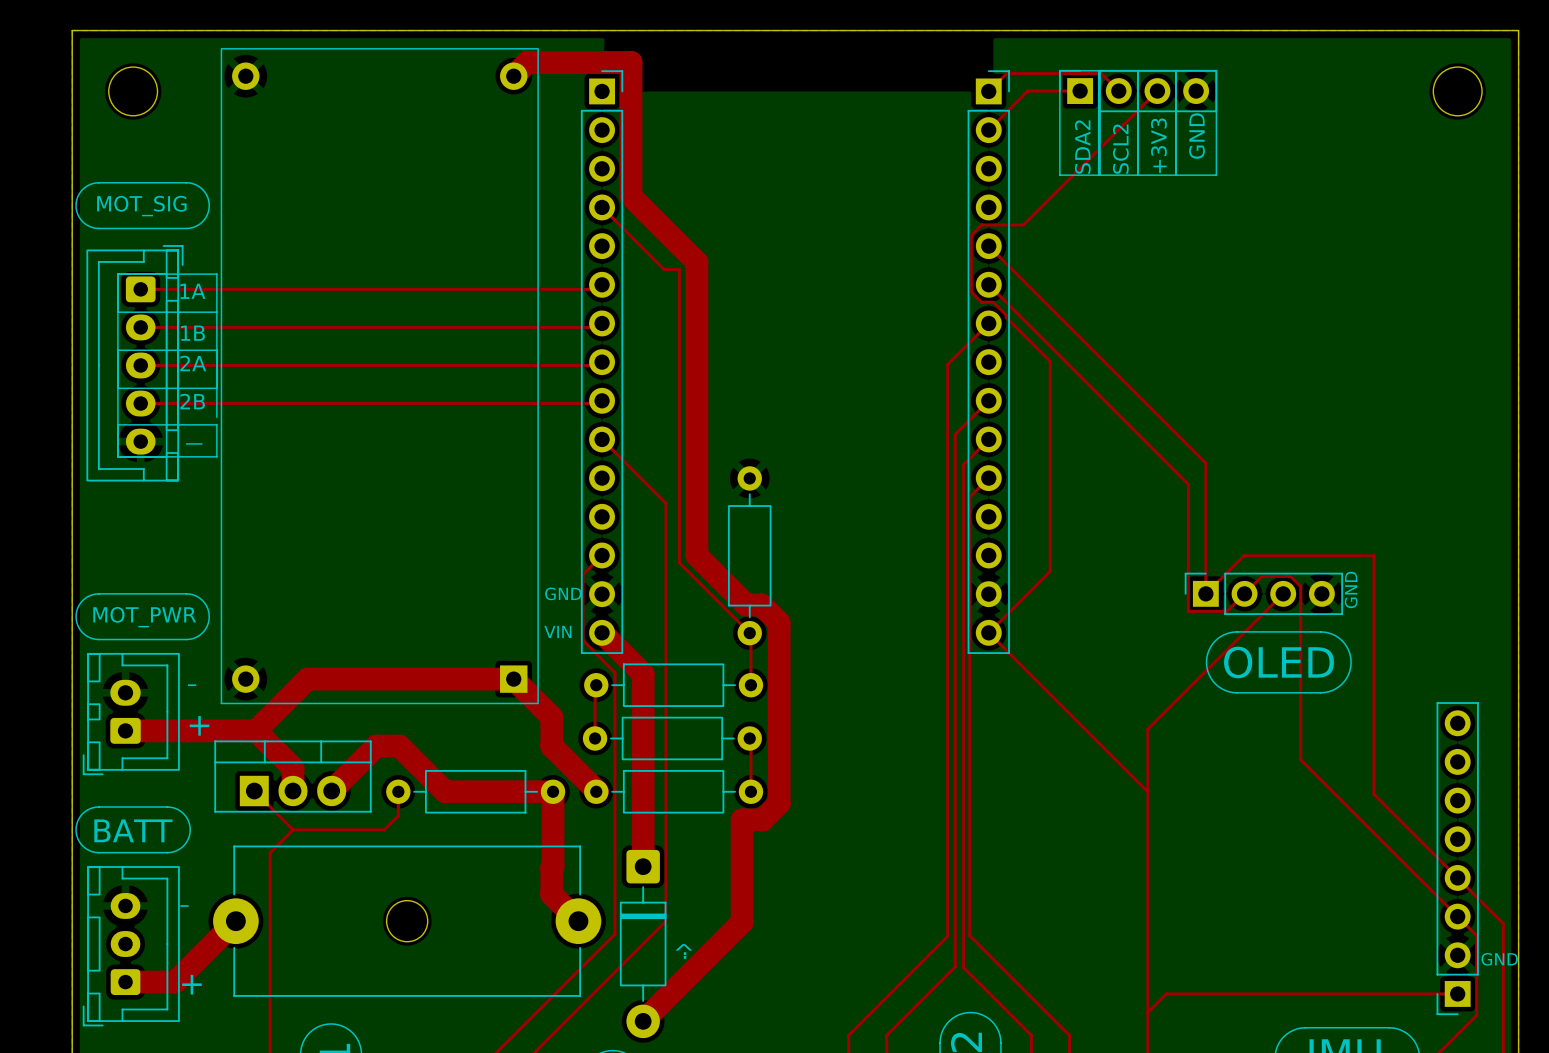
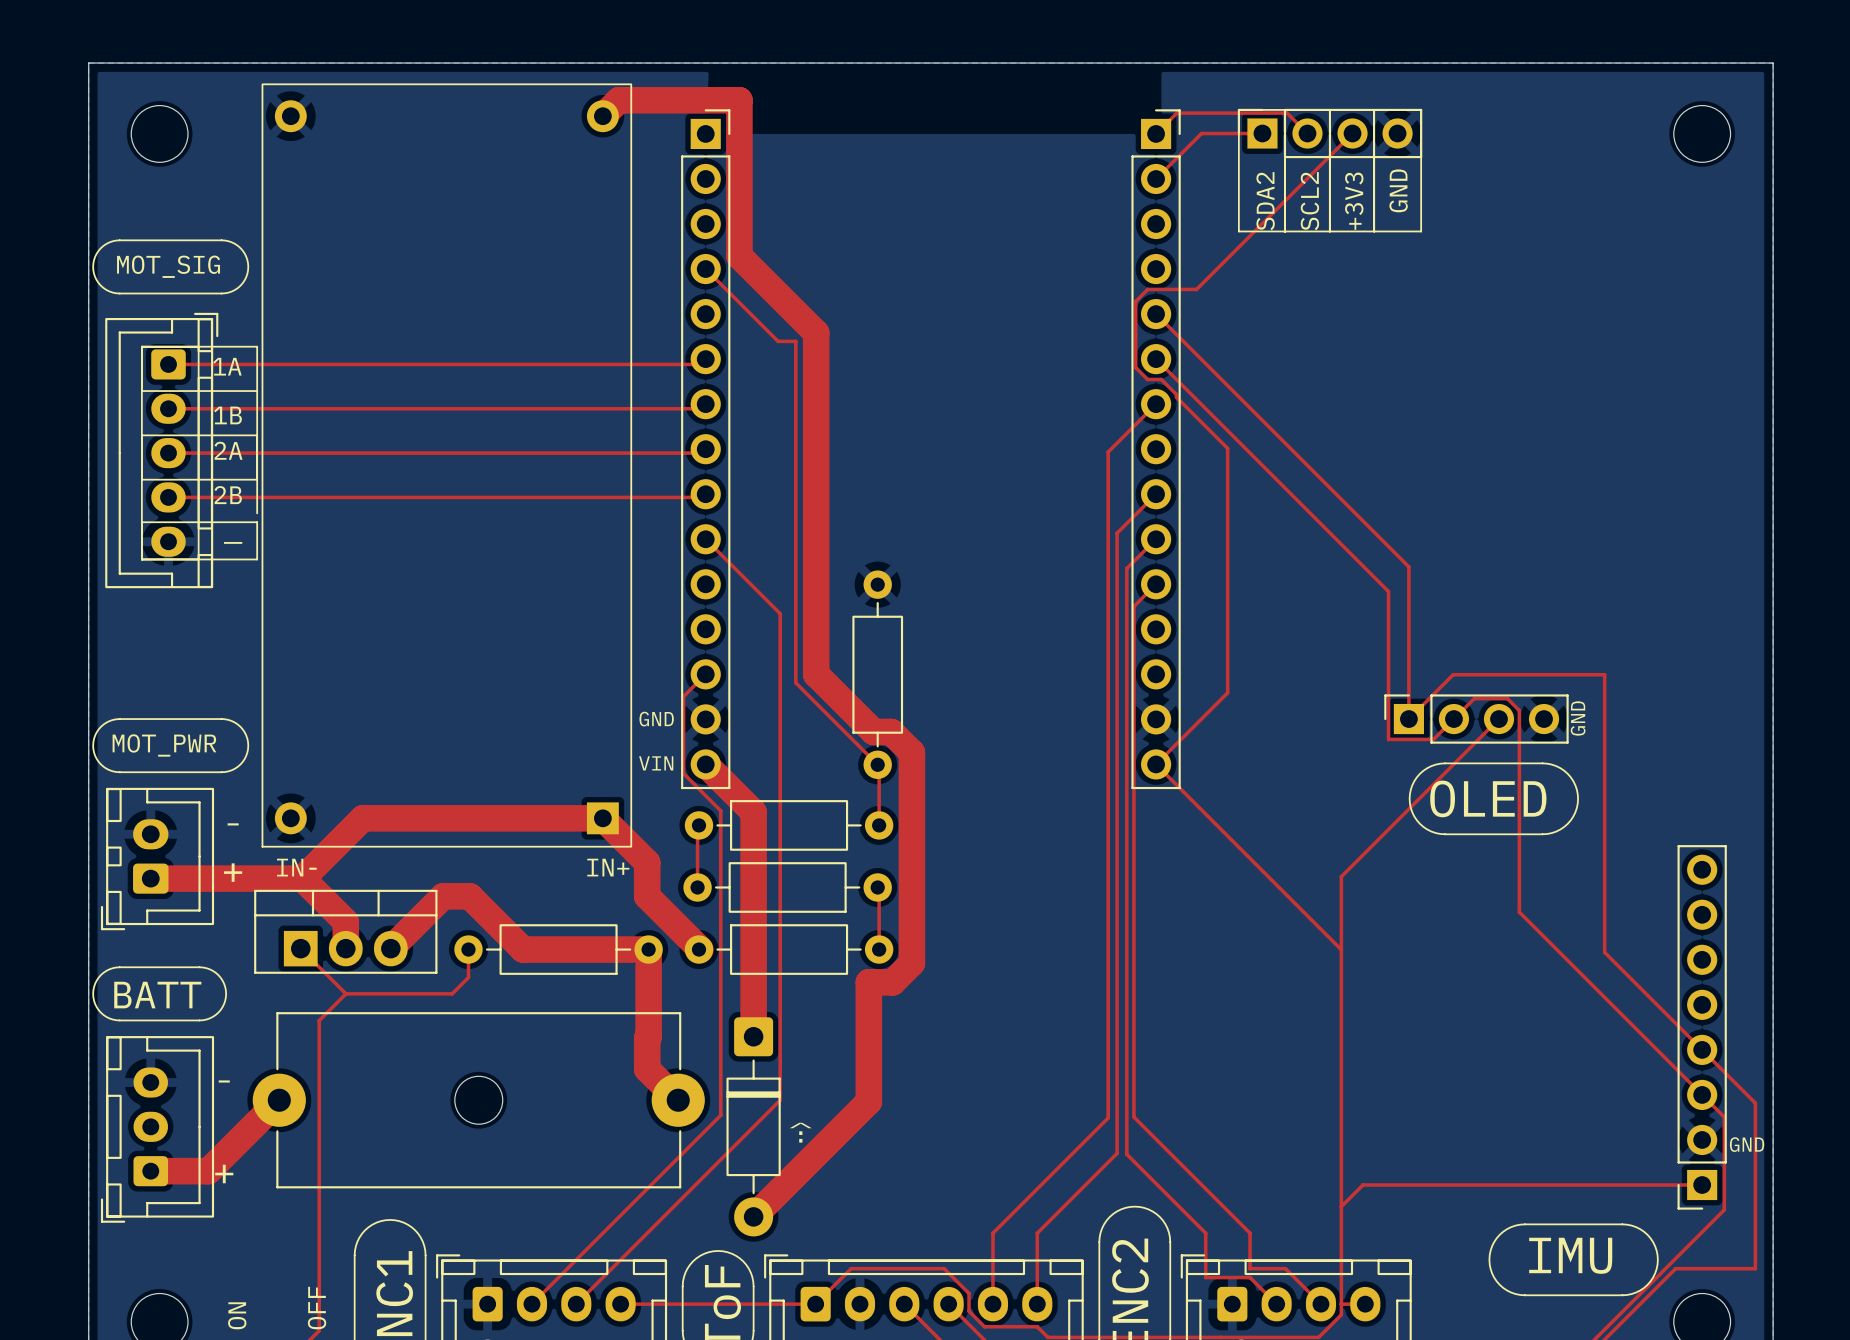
text: none -> IN- (296, 867)
text: none -> IN+ (608, 867)

